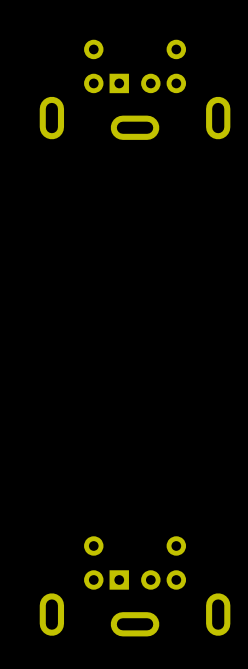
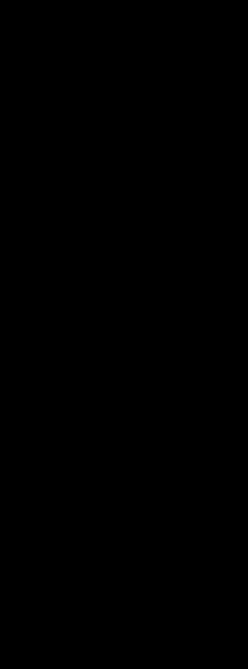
part: (135, 89) -> none
part: (135, 586) -> none

